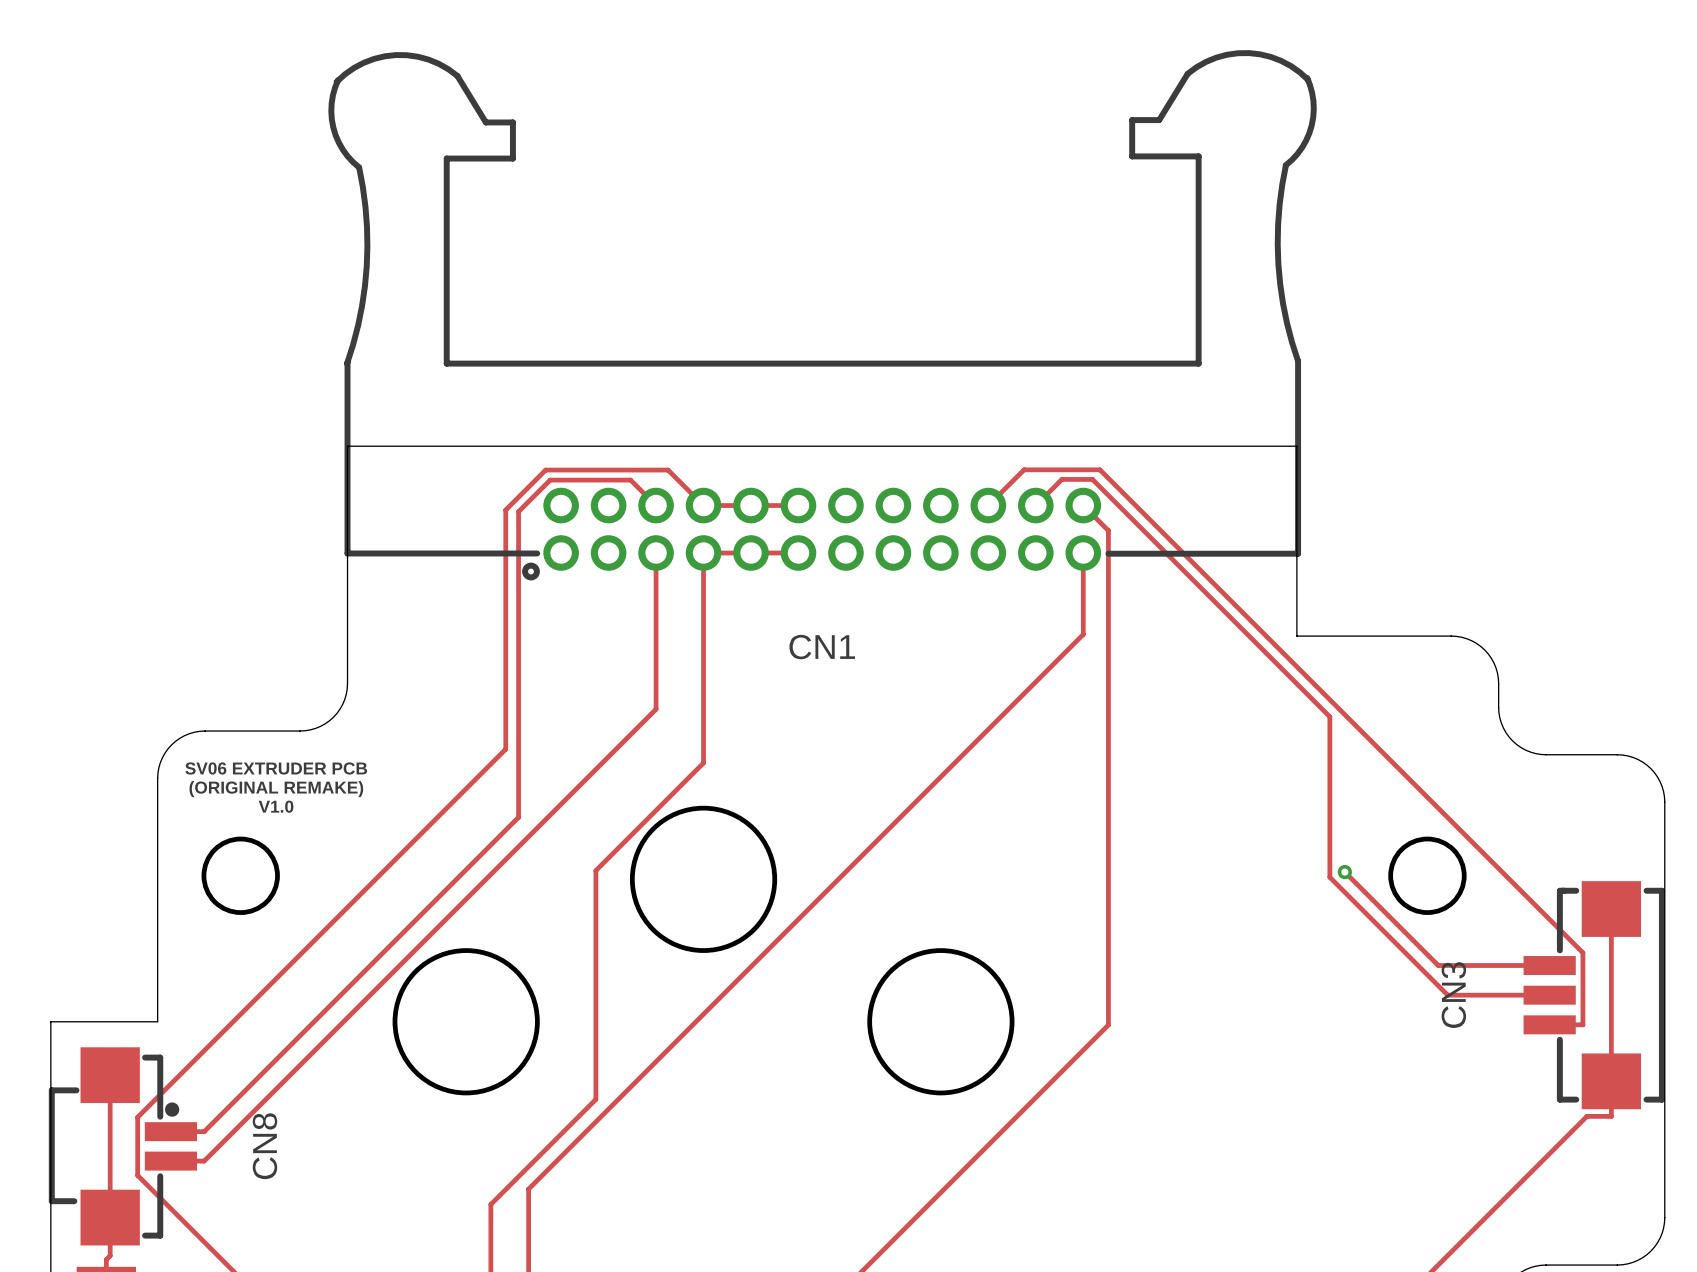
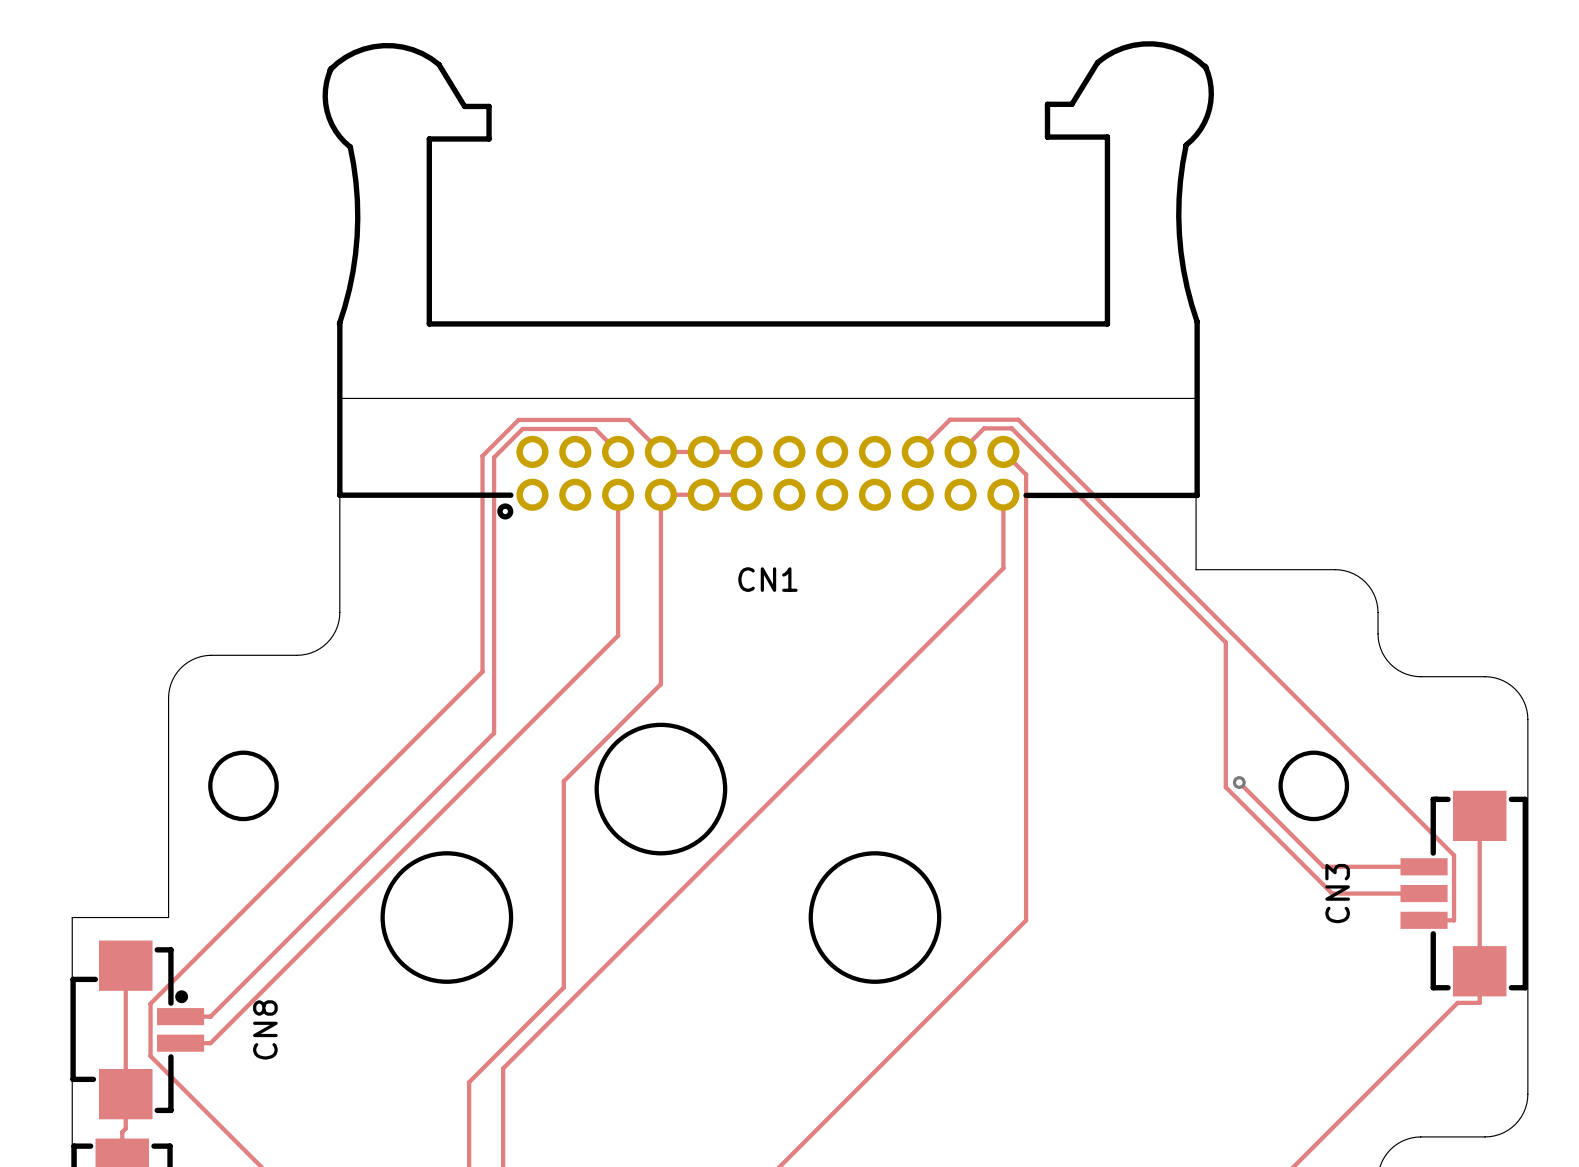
text: SV06 EXTRUDER PCB (276, 768) -> none
text: (ORIGINAL REMAKE) (276, 789) -> none
text: V1.0 (276, 806) -> none

